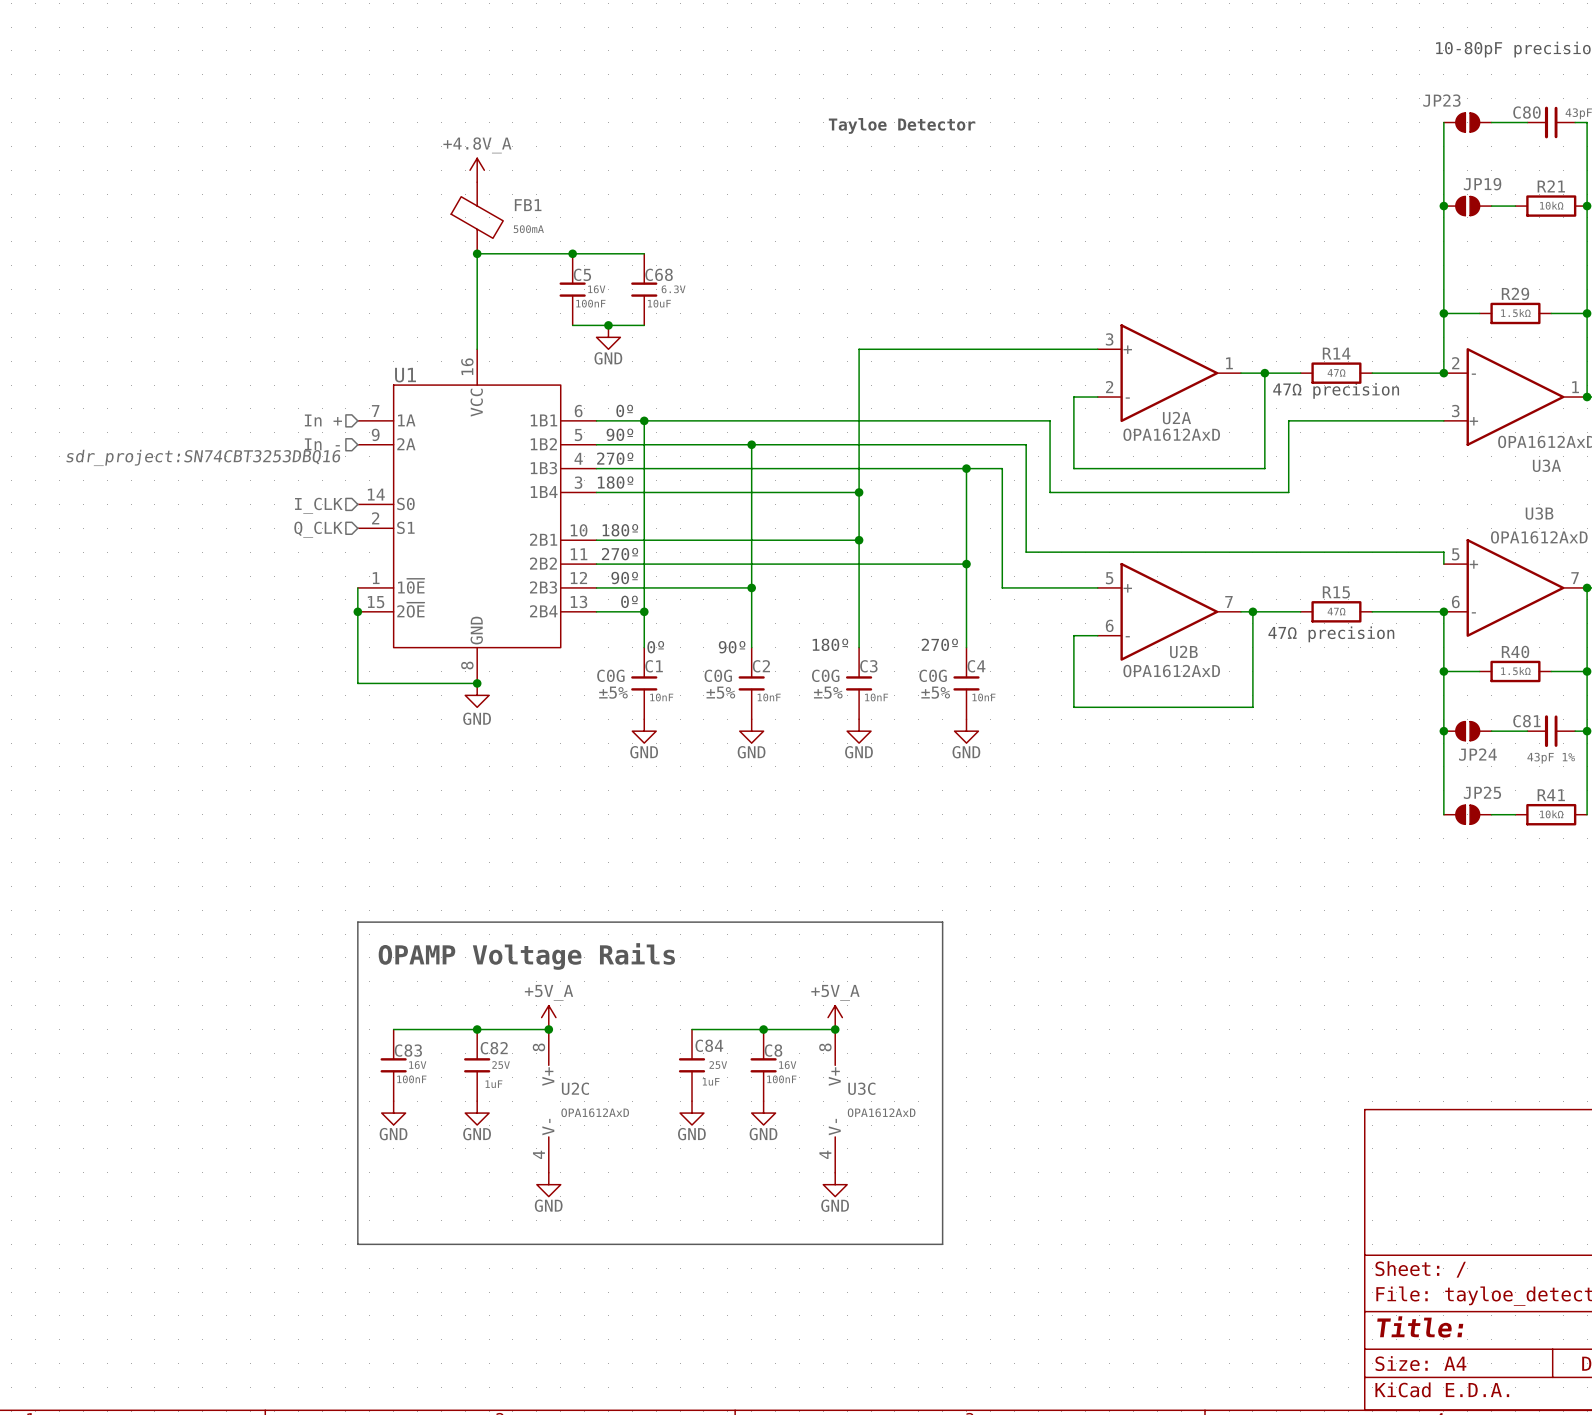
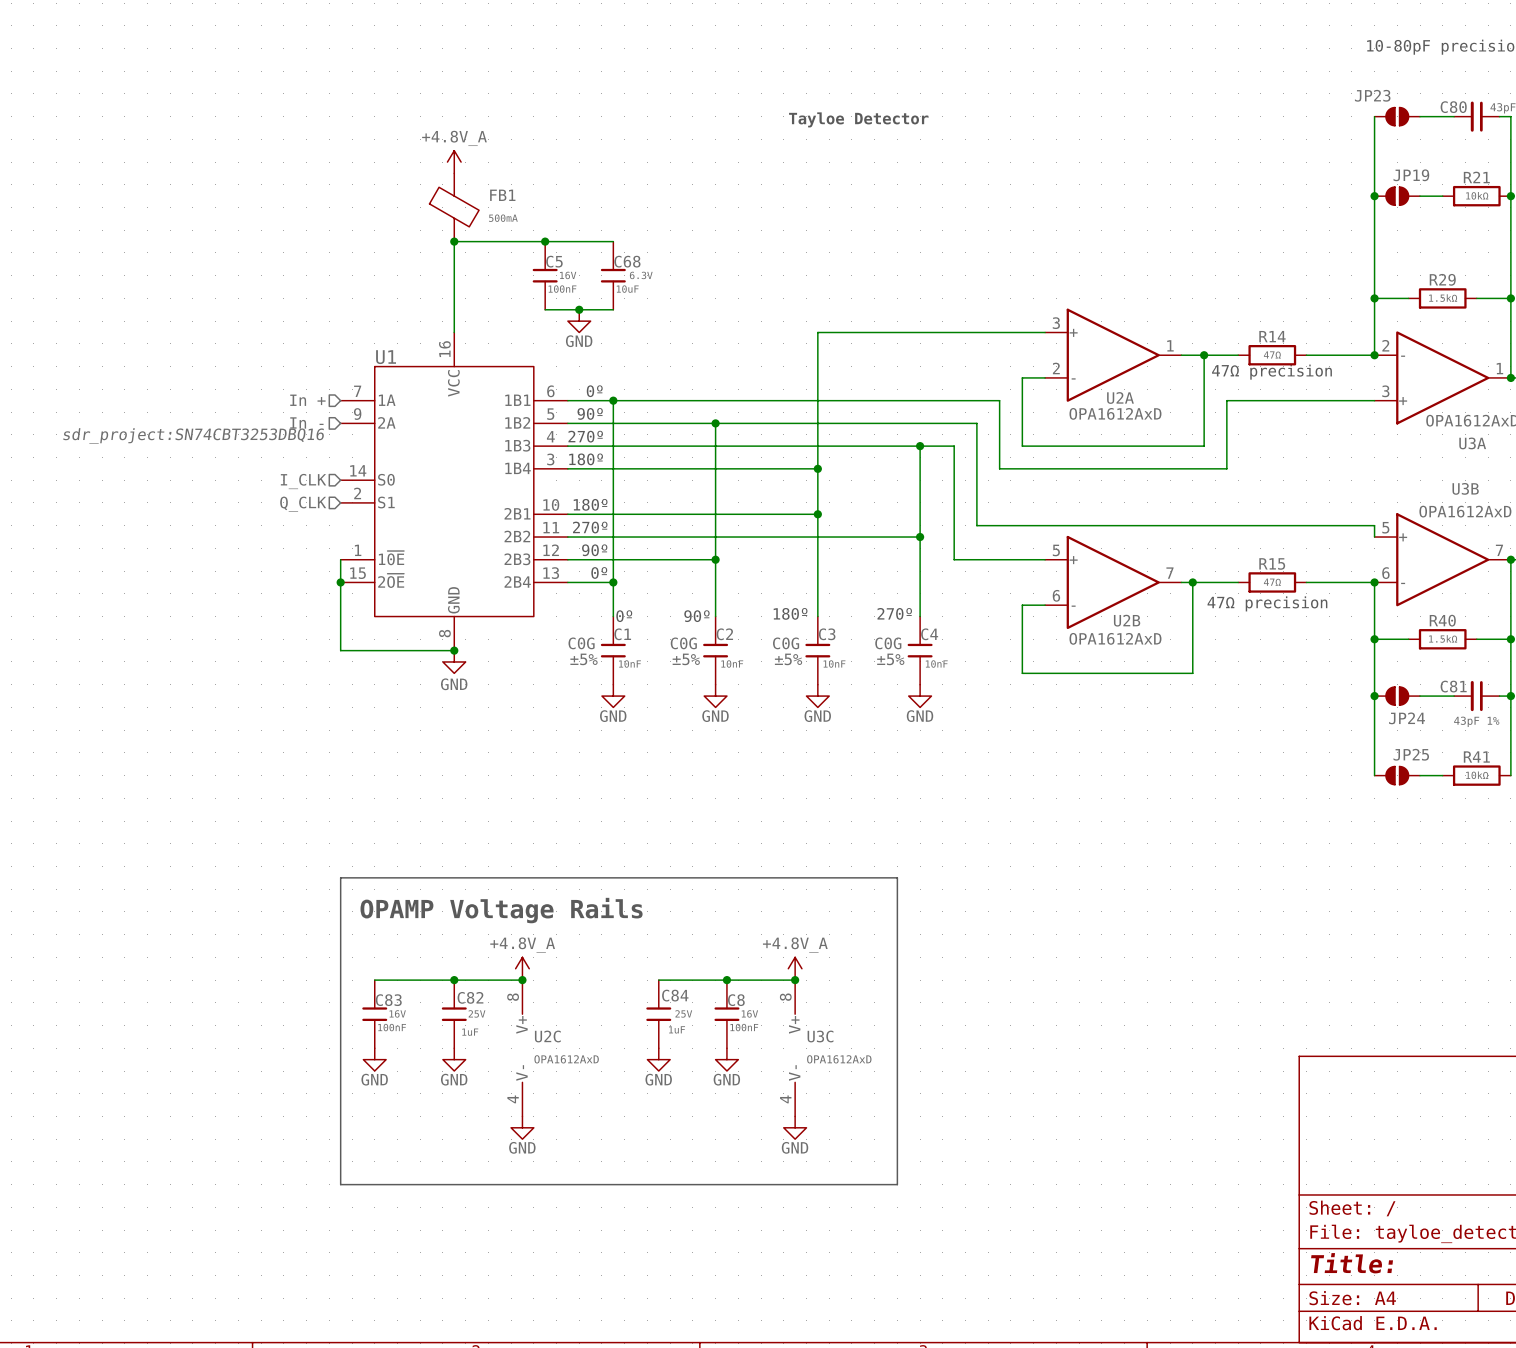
power symbol: +5V_A (548, 1017) -> +4.8V_A (522, 968)
power symbol: +5V_A (835, 1017) -> +4.8V_A (795, 968)

